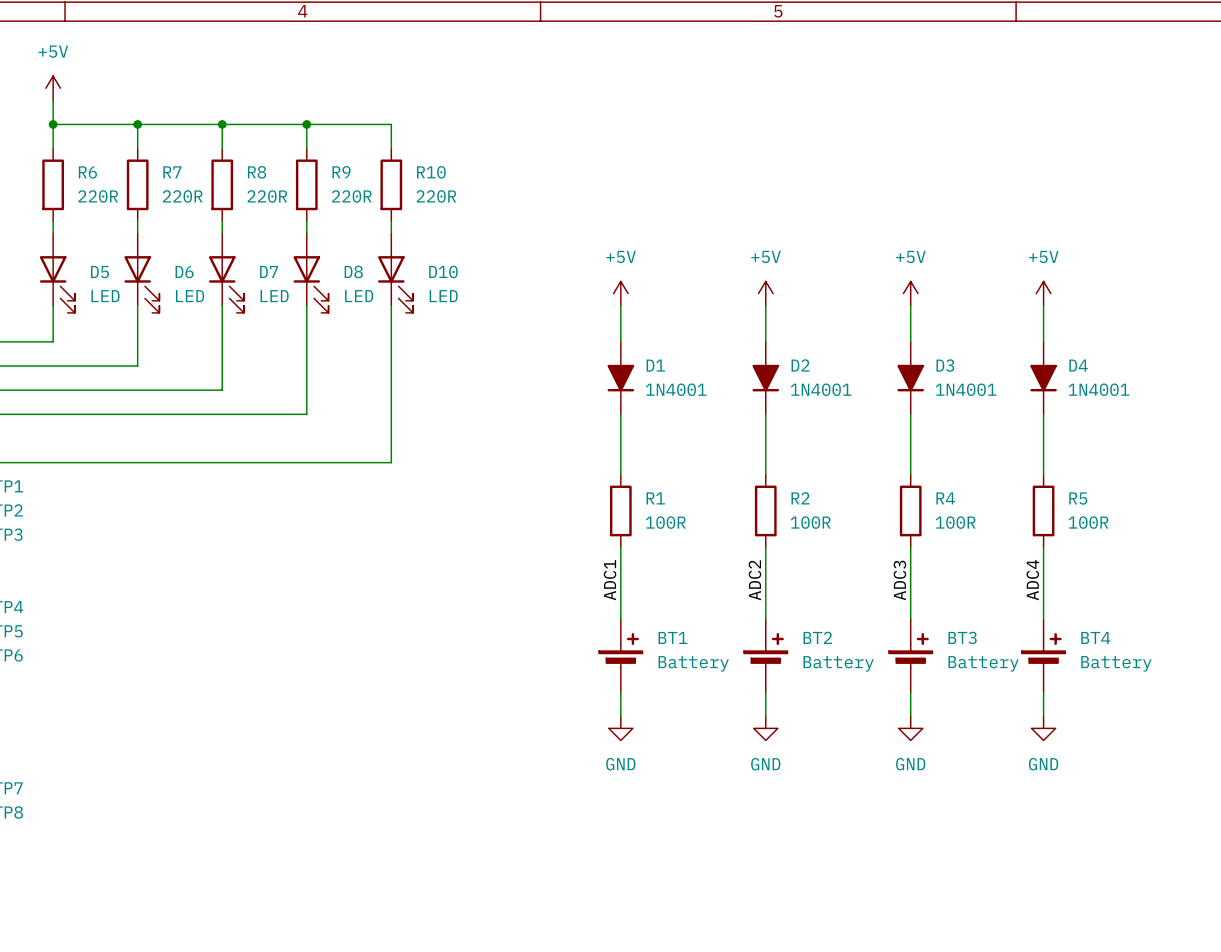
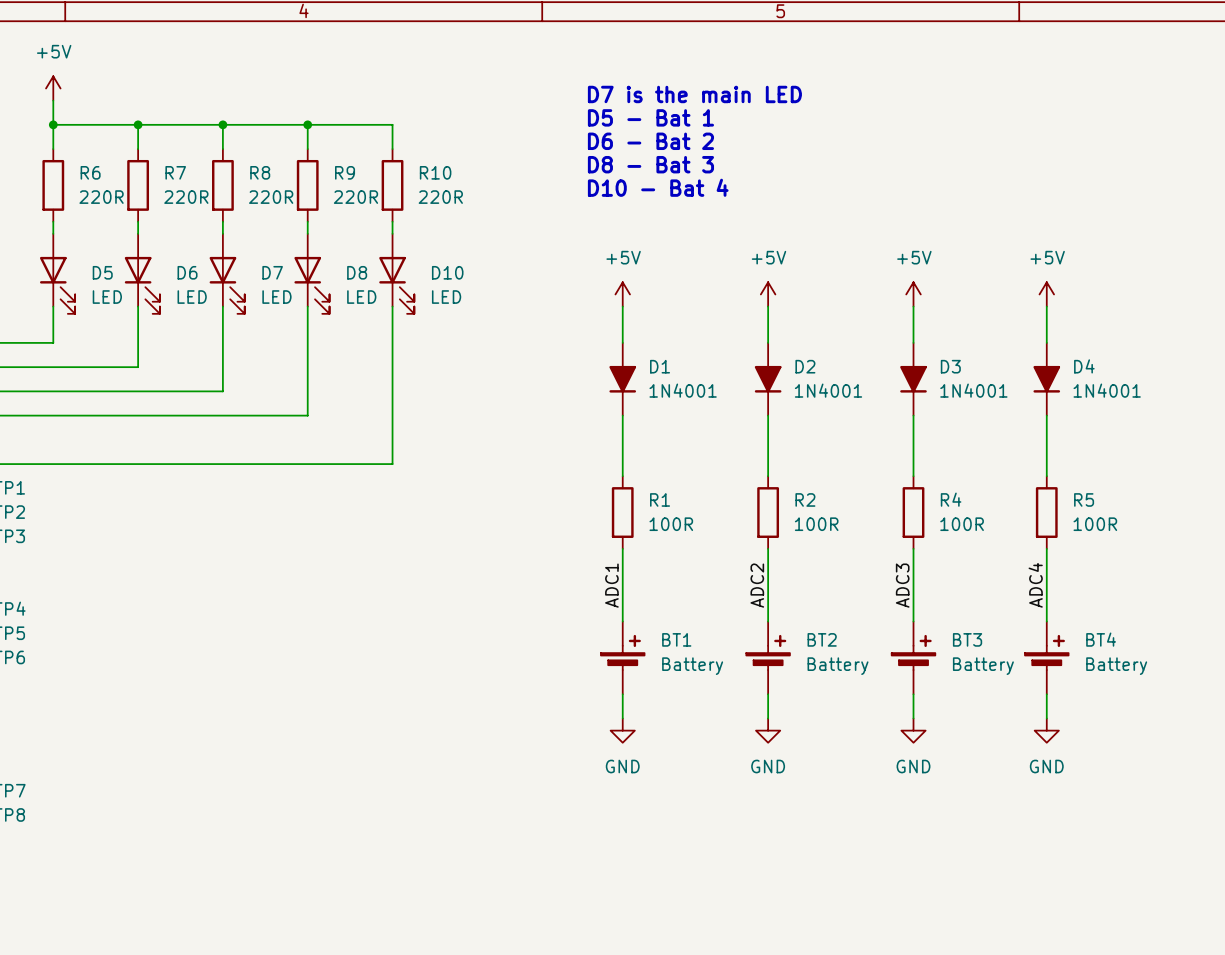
text: none -> D7 is the main LED (694, 94)
text: none -> D5 - Bat 1 (650, 117)
text: none -> D6 - Bat 2 (650, 141)
text: none -> D8 - Bat 3 (650, 164)
text: none -> D10 - Bat 4 (658, 187)

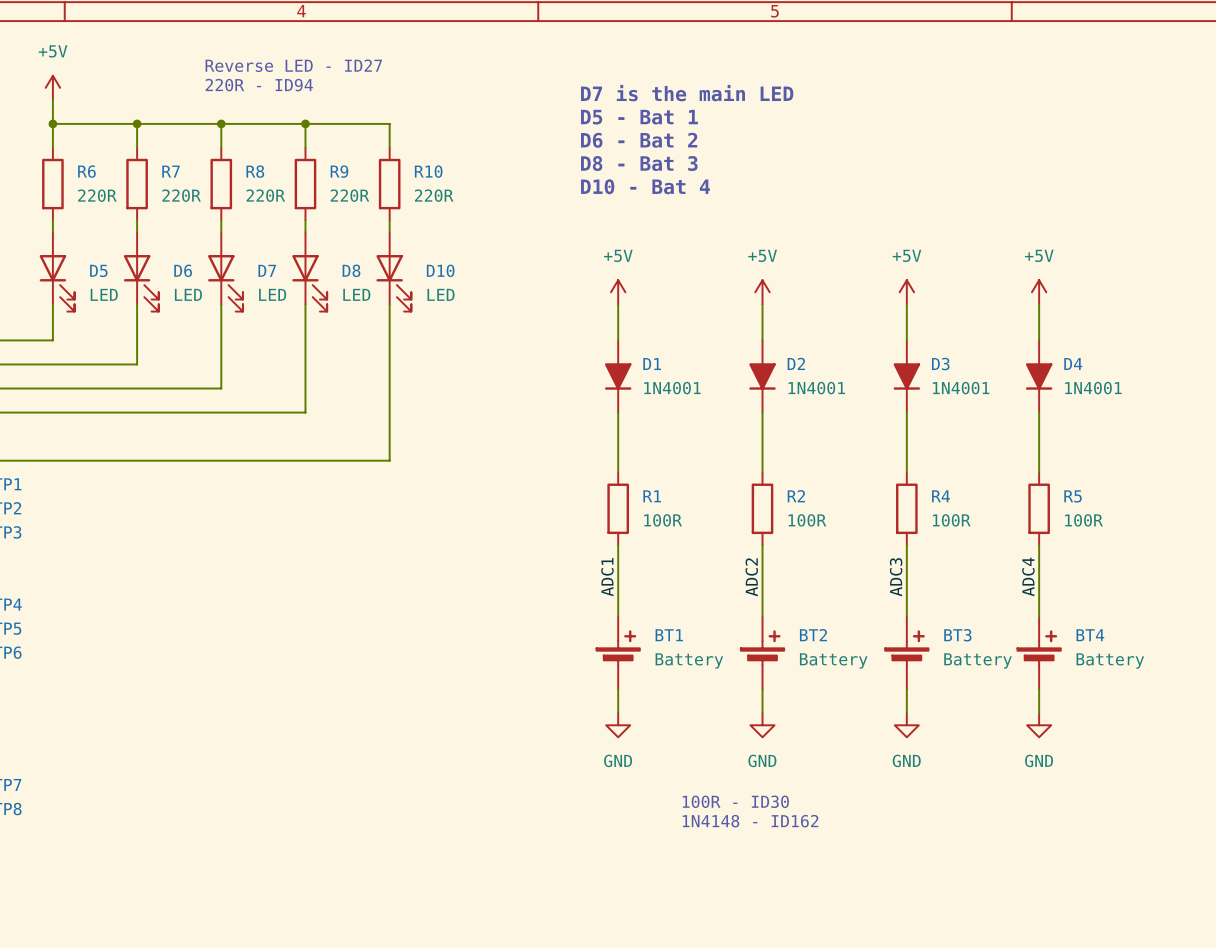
text: none -> Reverse LED - ID27 (293, 65)
text: none -> 220R - ID94 (259, 85)
text: none -> 100R - ID30 (735, 801)
text: none -> 1N4148 - ID162 (750, 821)

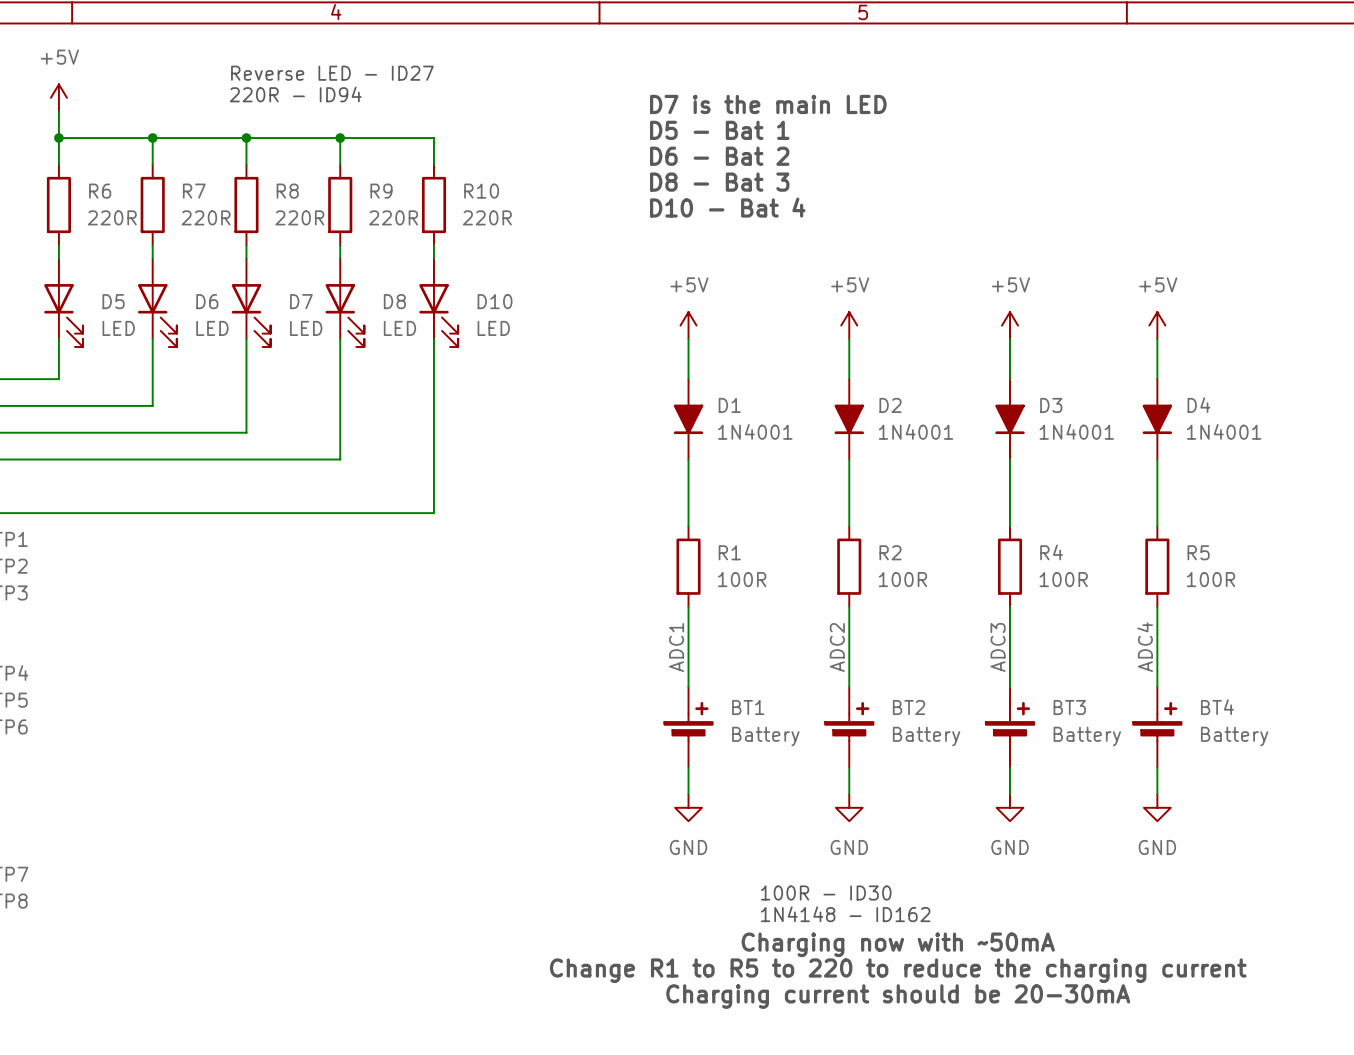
text: none -> Charging now with ~50mA (898, 944)
text: none -> Change R1 to R5 to 220 to reduce the charging current (898, 970)
text: none -> Charging current should be 20-30mA (898, 996)

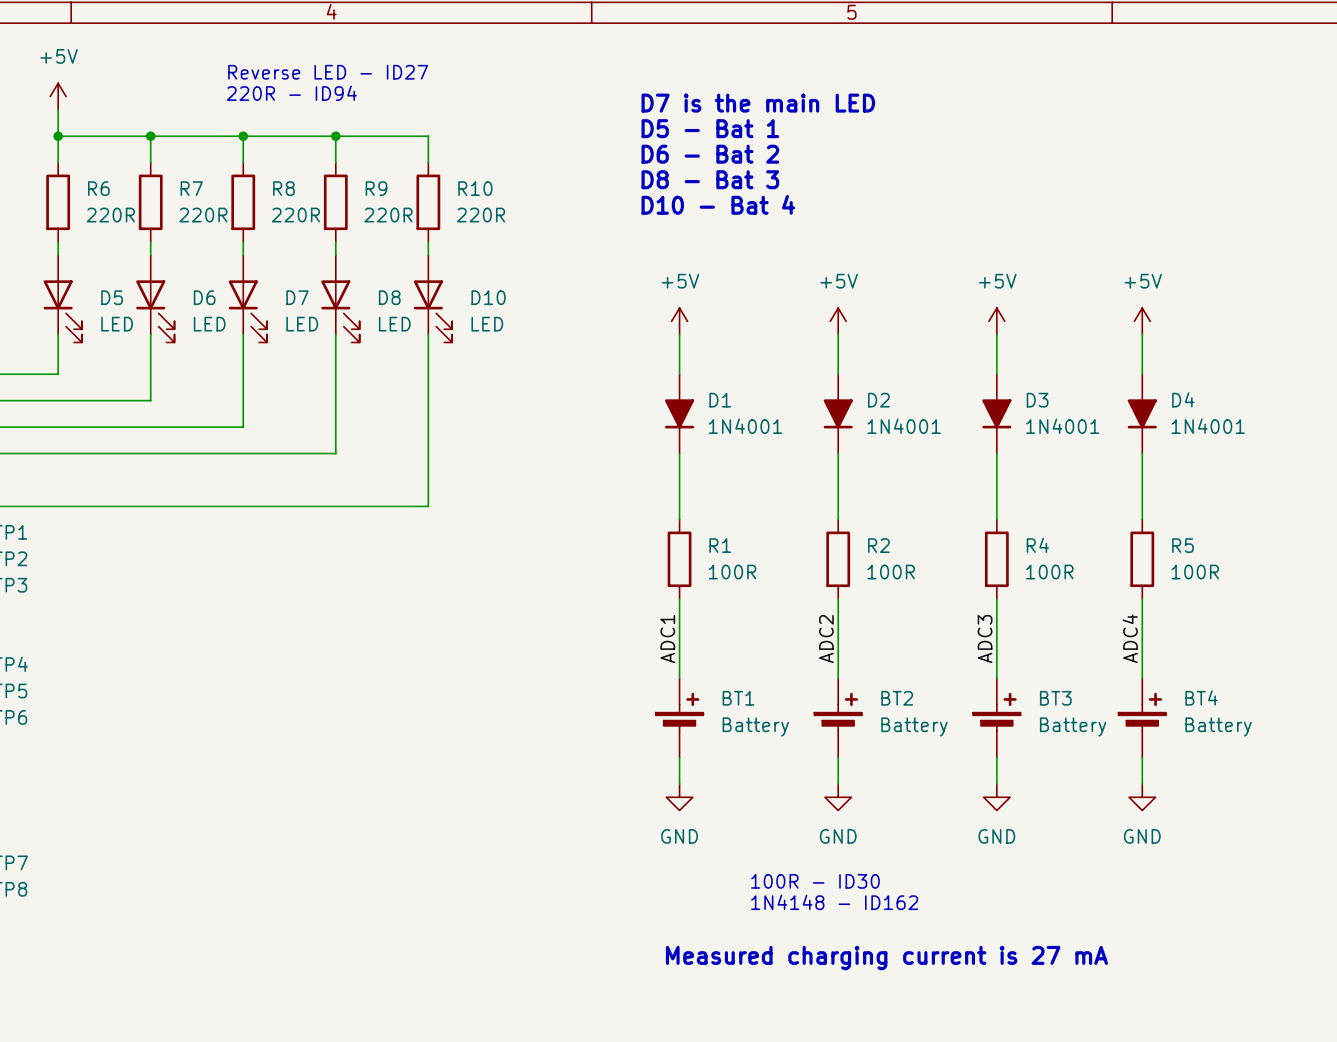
text: Charging now with ~50mA (898, 944) -> none
text: Change R1 to R5 to 220 to reduce the charging current (898, 970) -> Measured charging current is 27 mA (886, 958)
text: Charging current should be 20-30mA (898, 996) -> none

